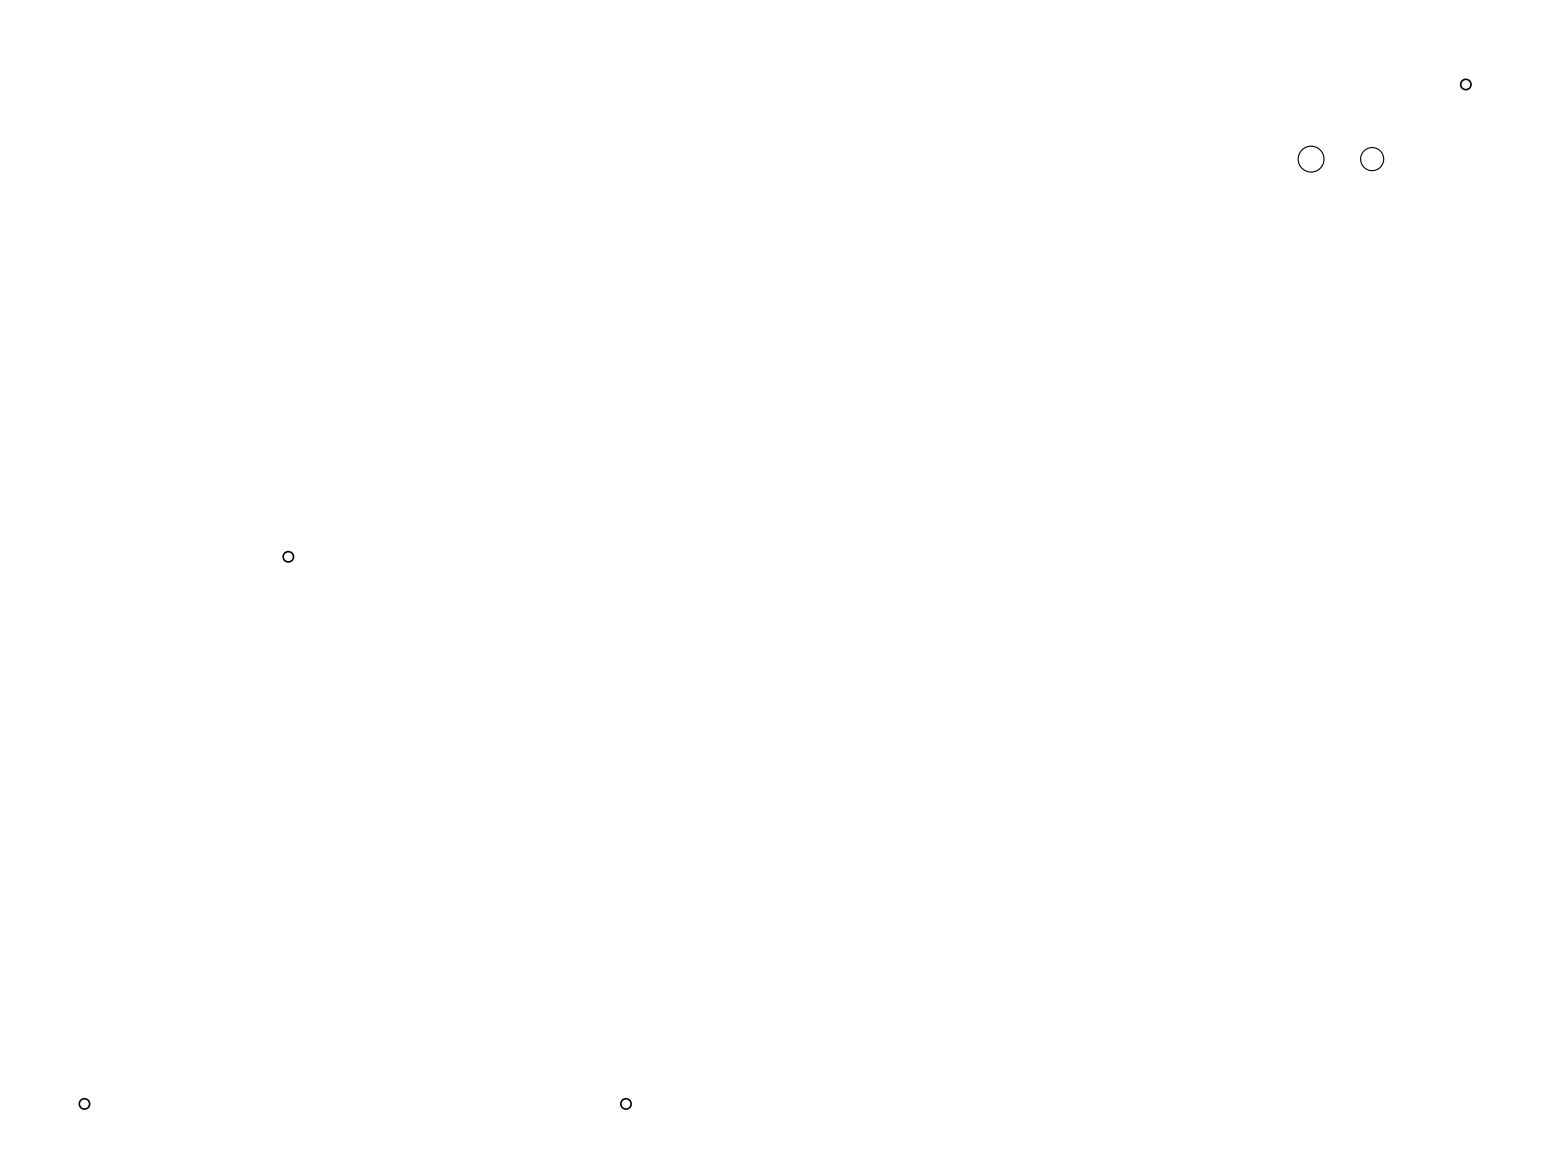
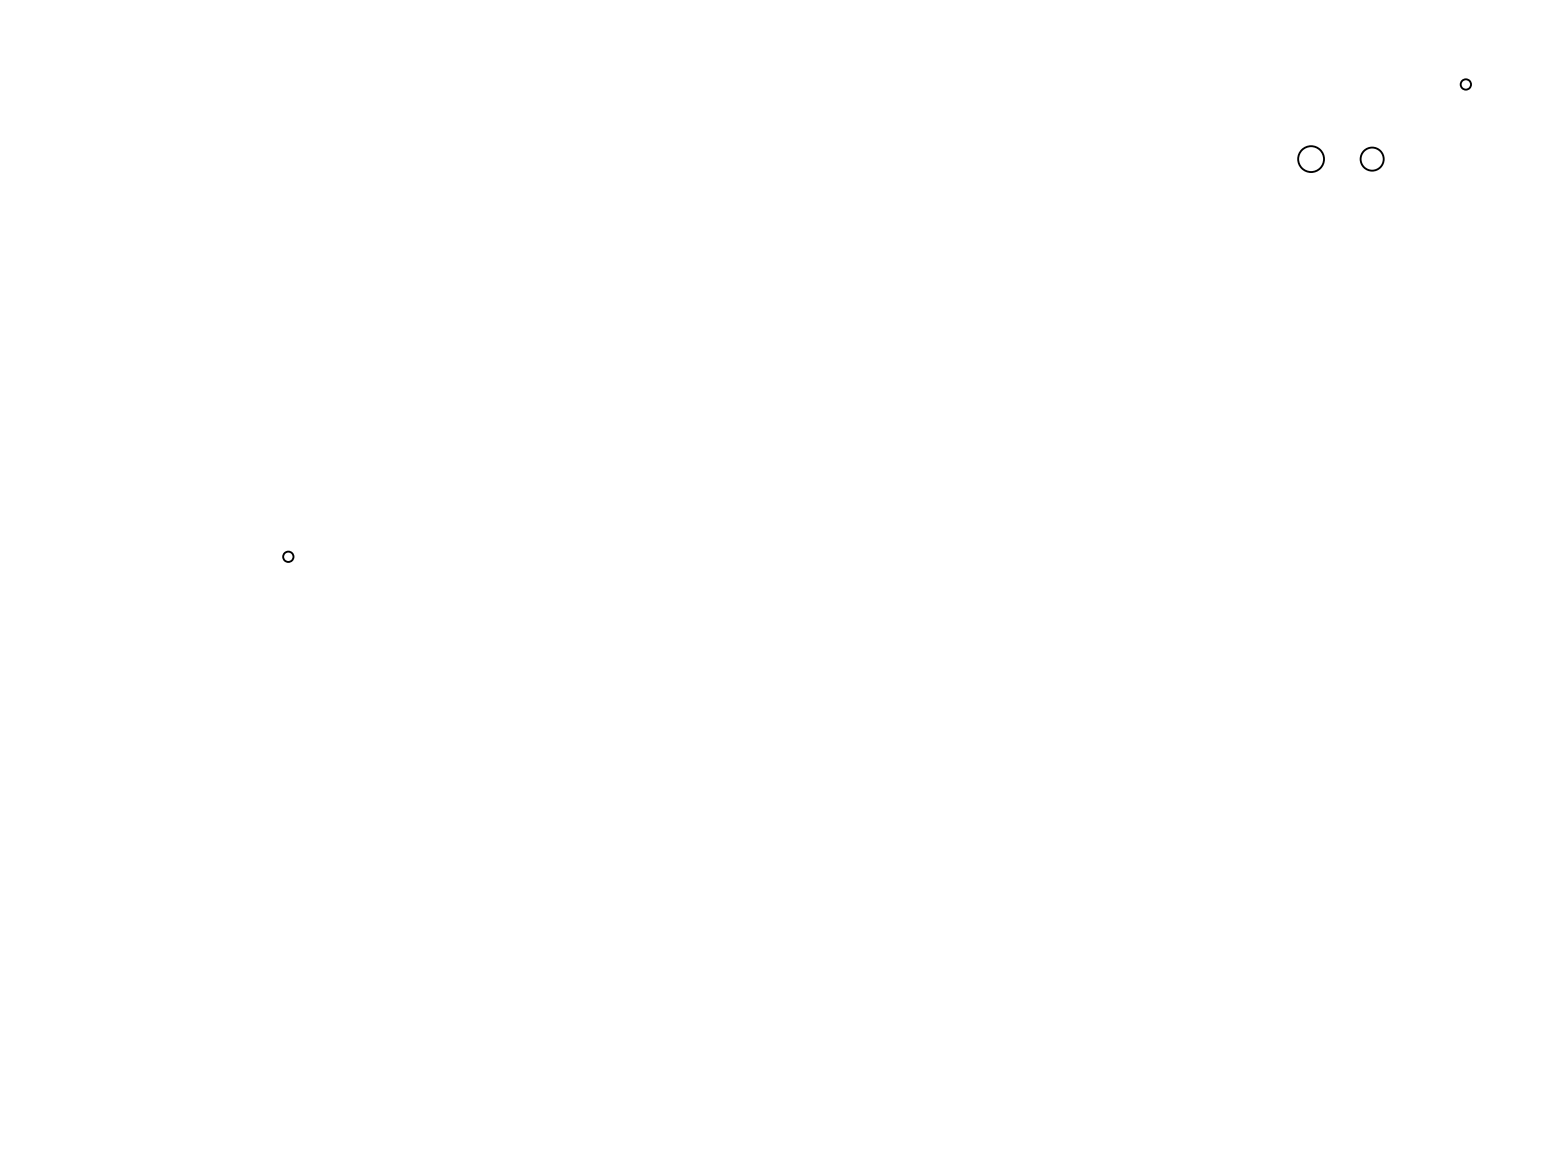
part: (84, 1103) -> none
part: (625, 1103) -> none

